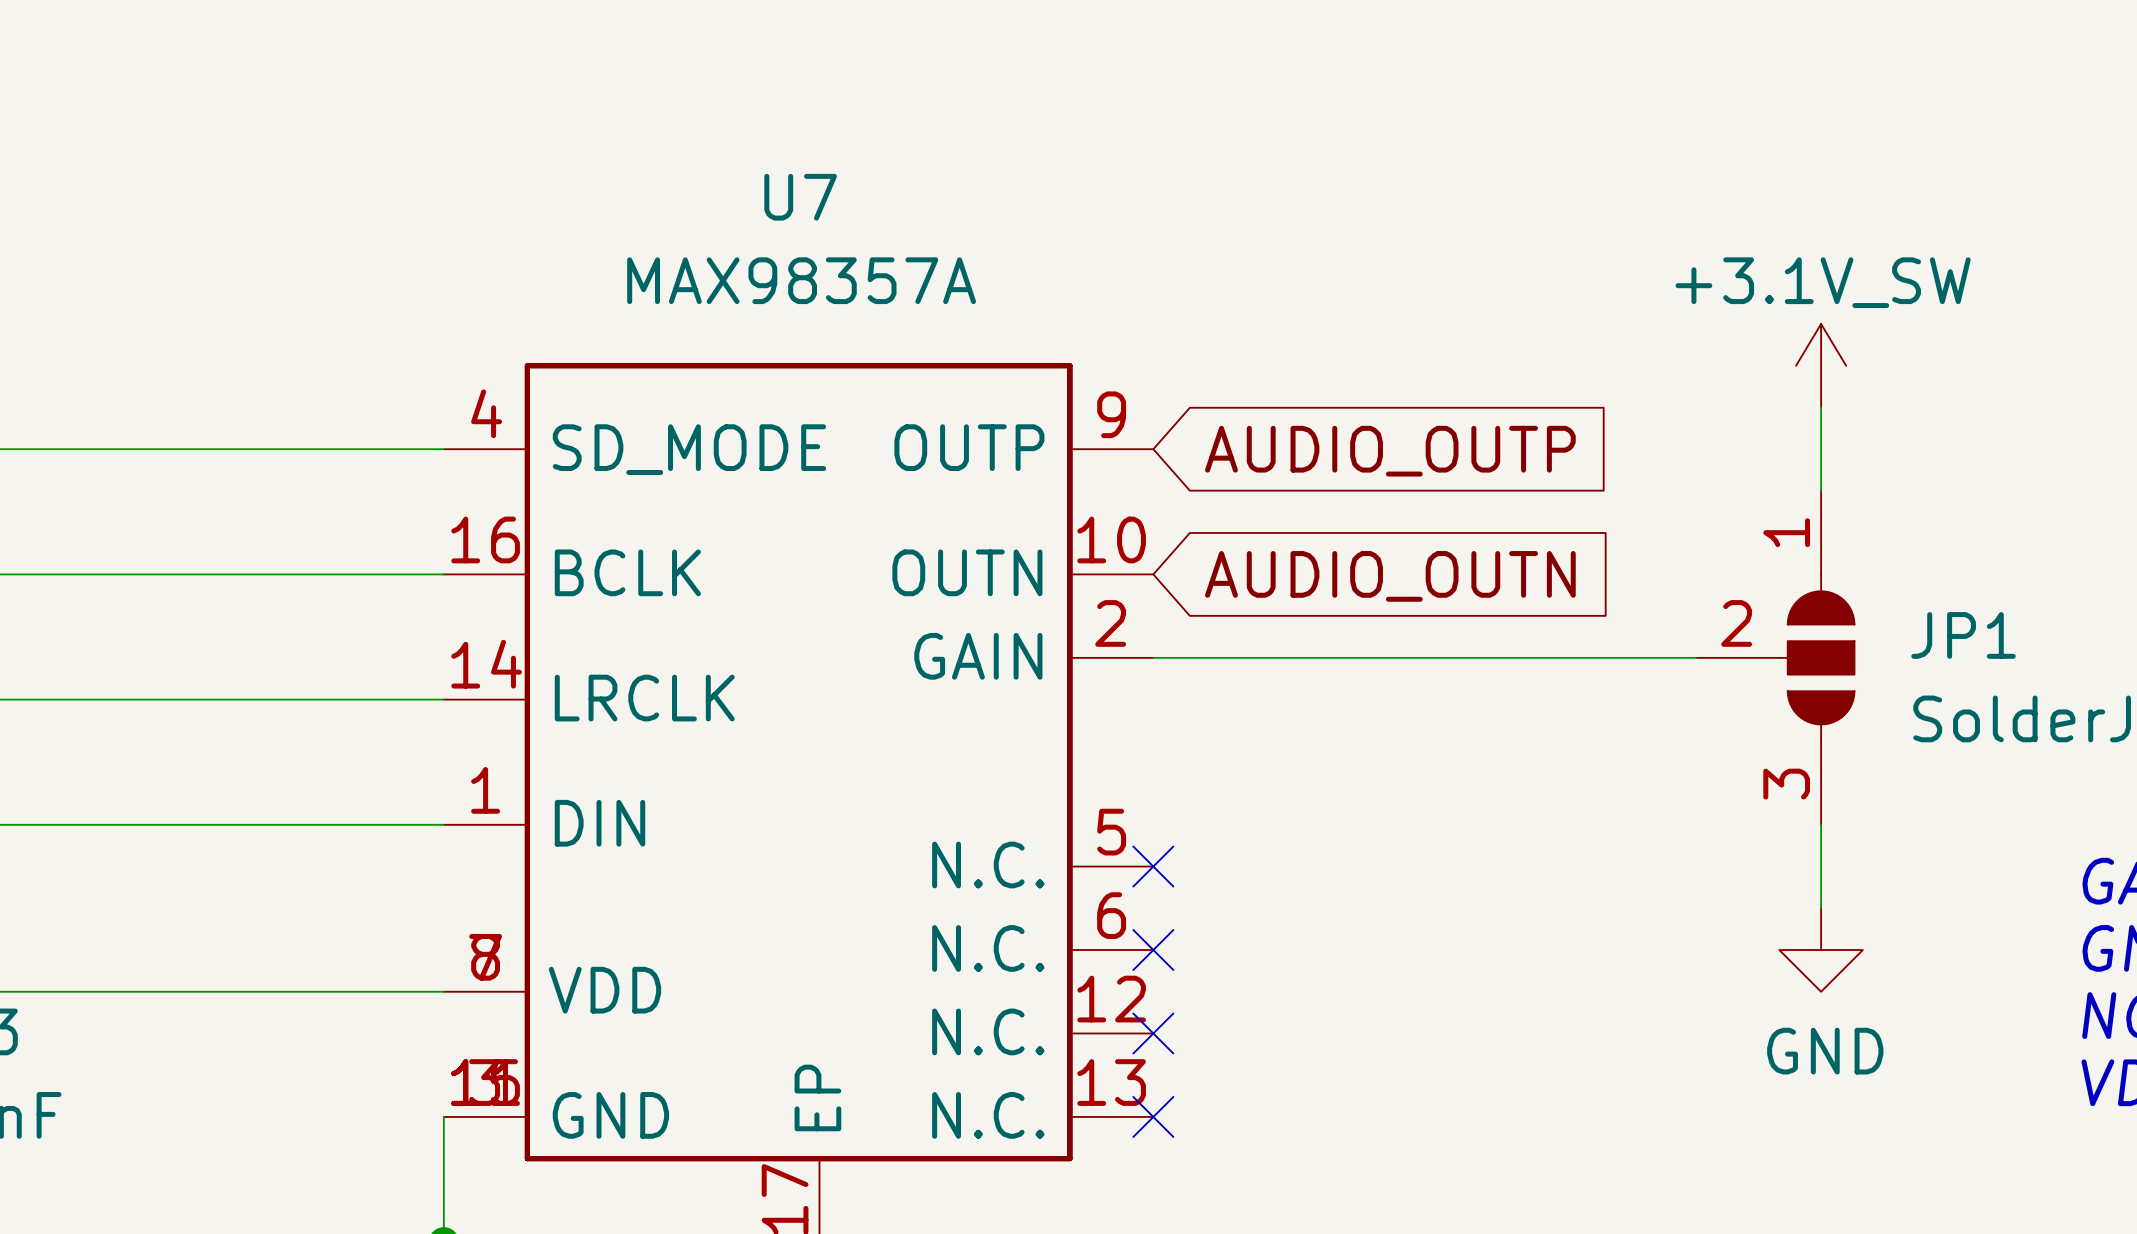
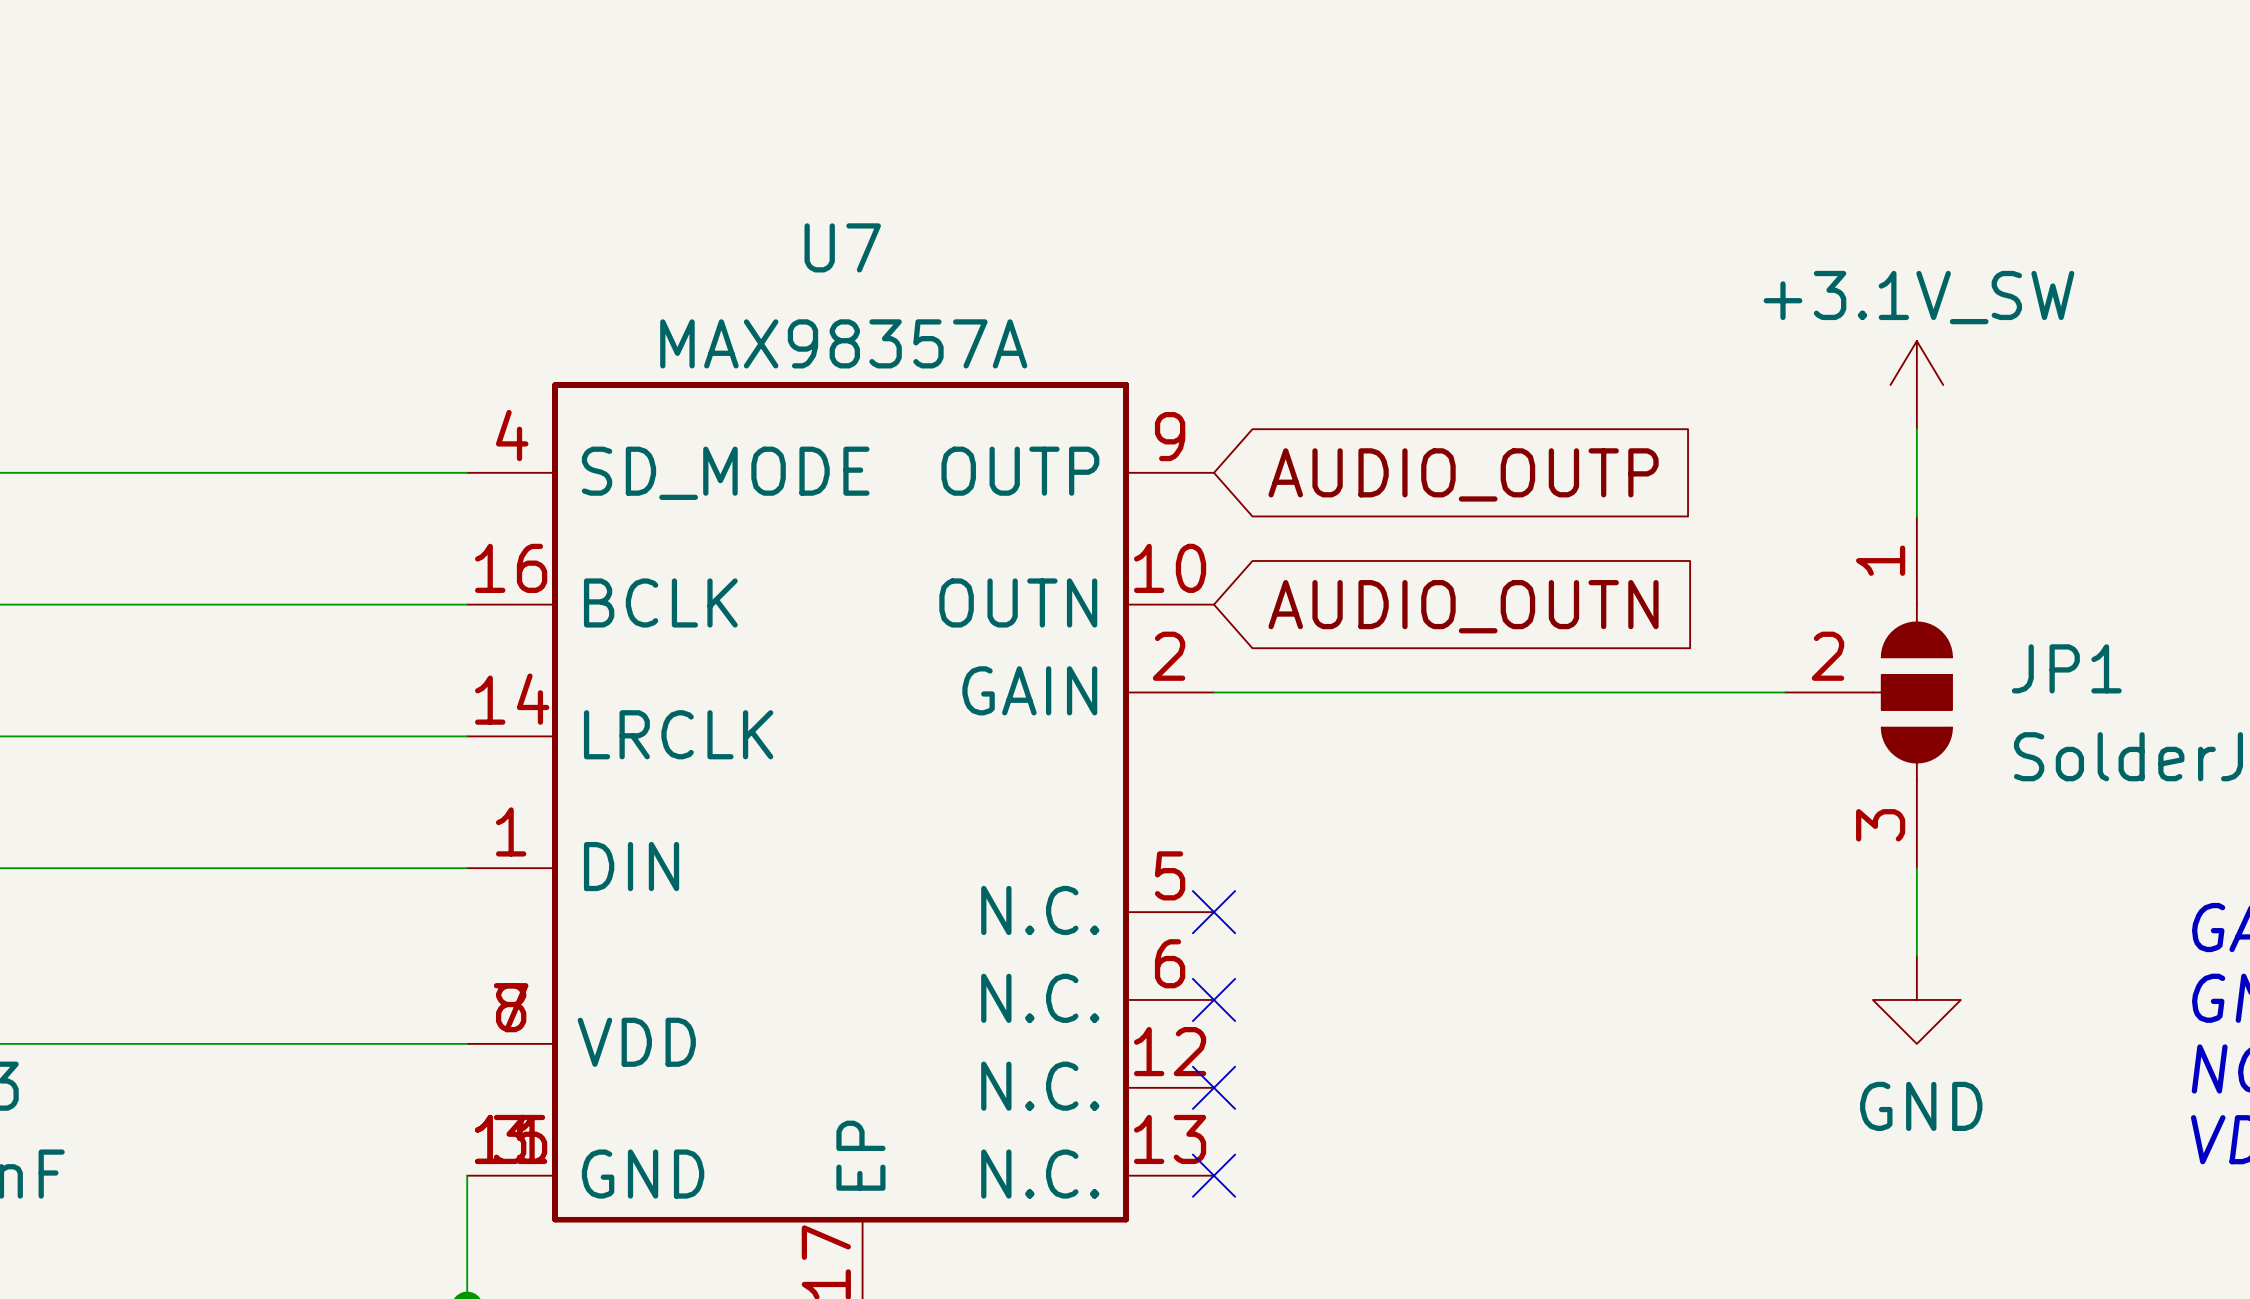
U7 name position: U7 (800, 197) -> U7 (842, 247)
U7 value position: MAX98357A (801, 280) -> MAX98357A (843, 343)

